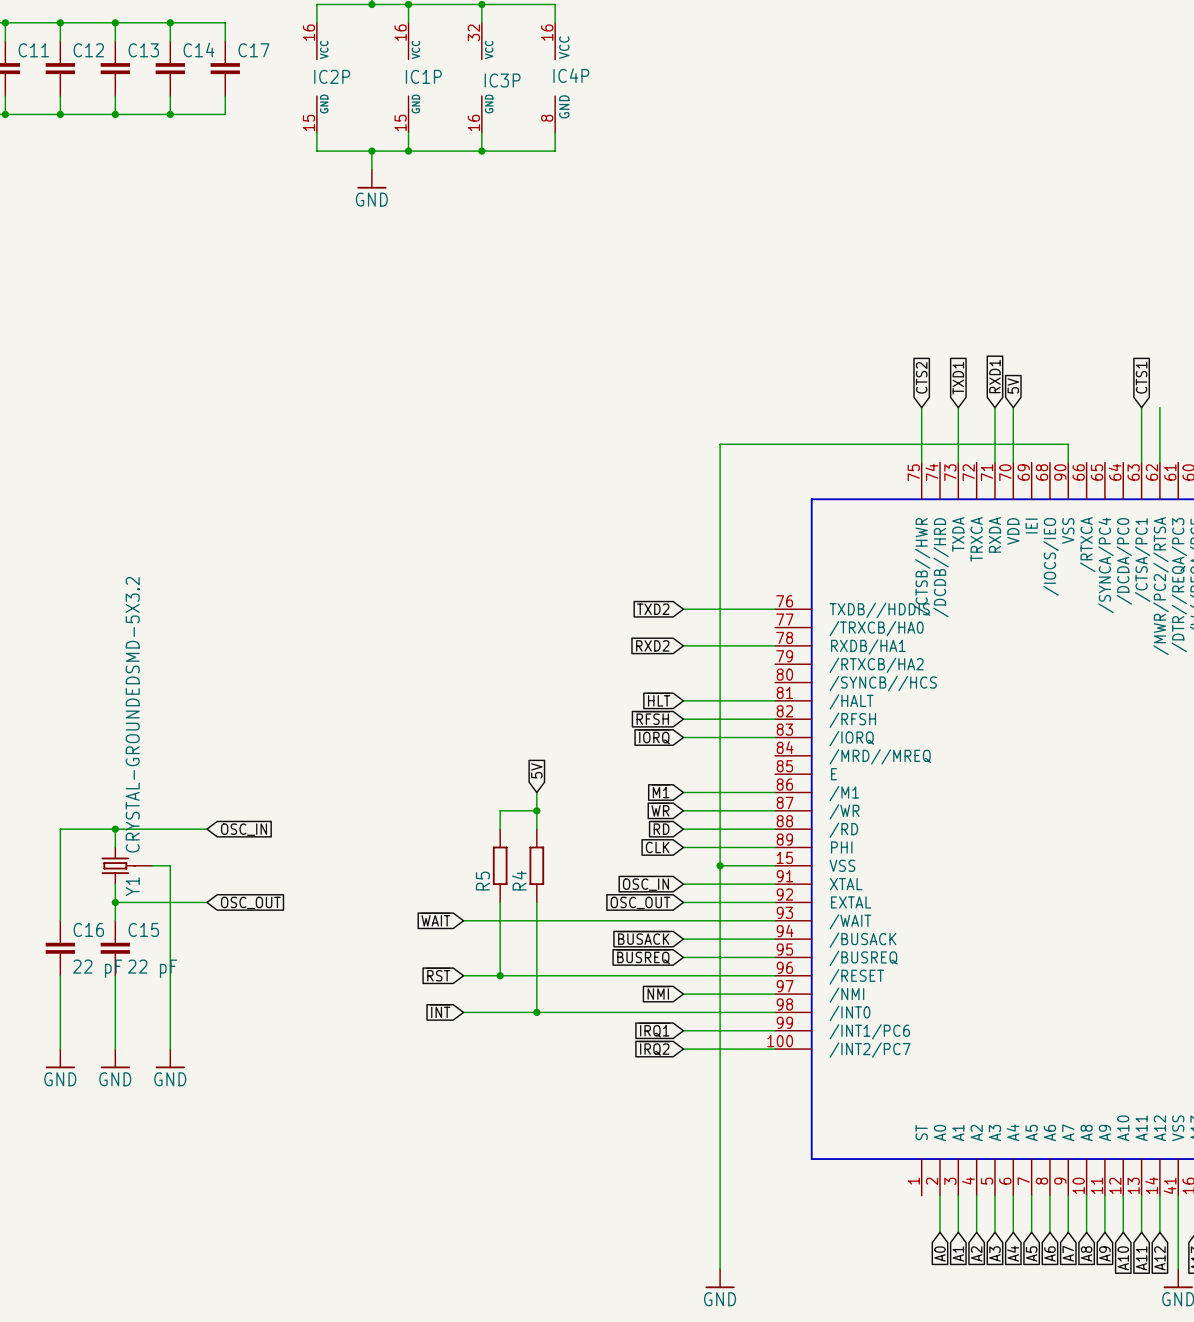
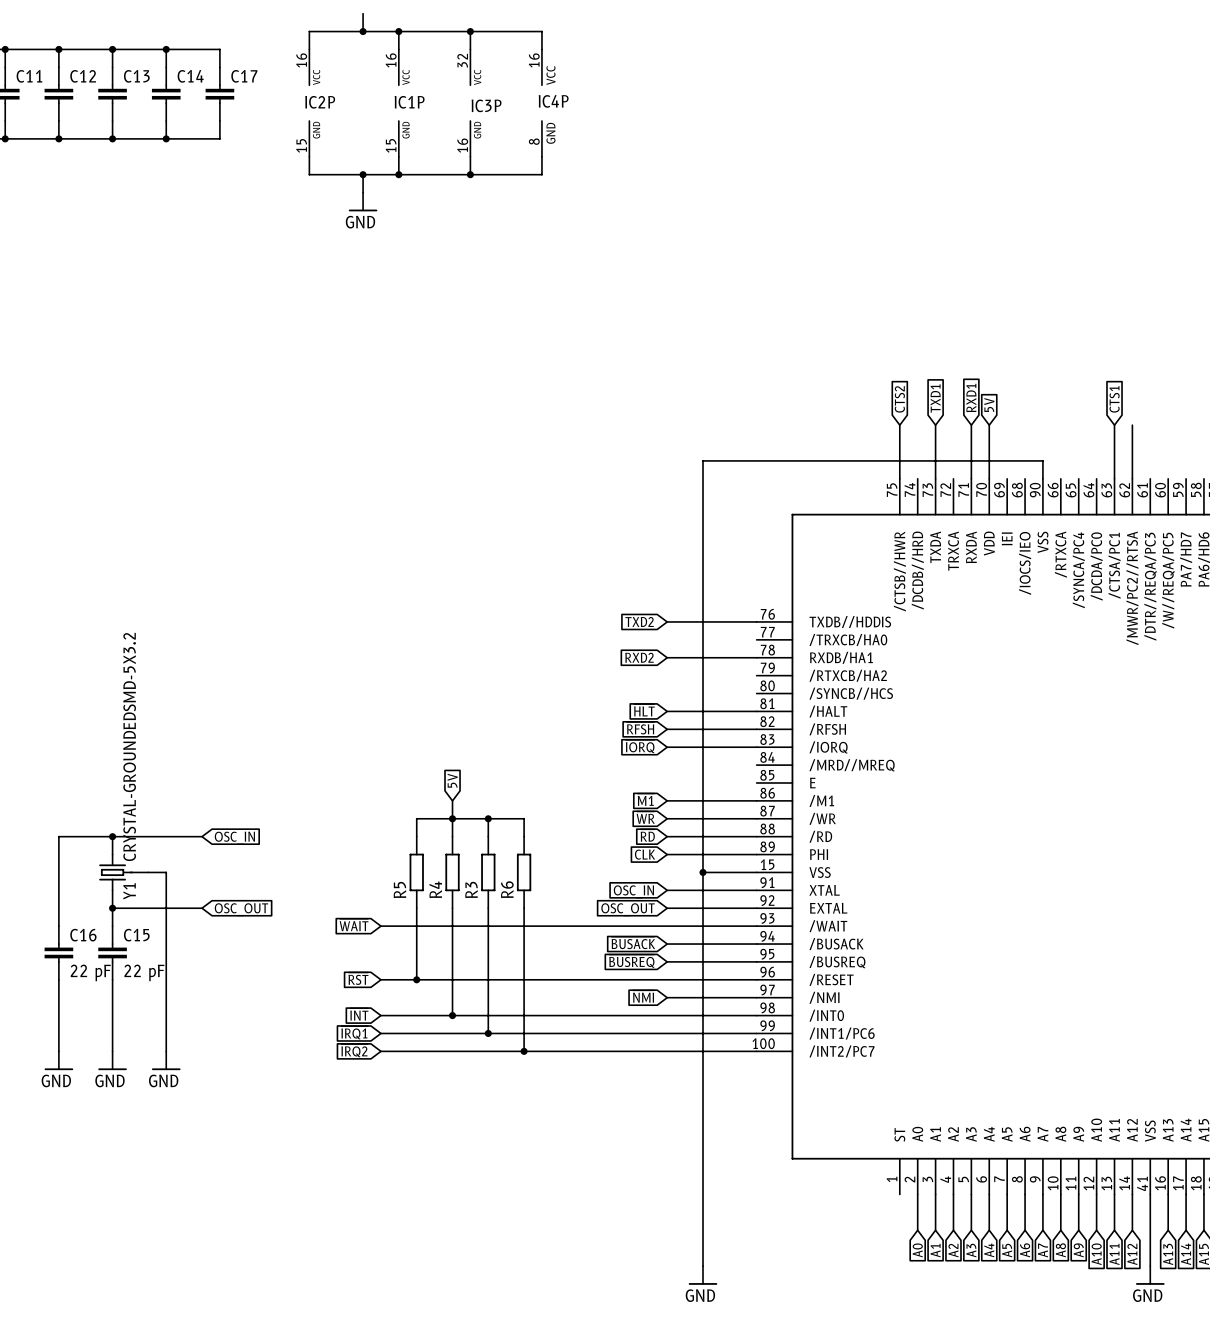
global label position: 5V (536, 770) -> 5V (452, 780)
wire: none -> (452, 800) (452, 836)
wire: (536, 792) (536, 810) -> none
junction: none -> (452, 818)
wire: none -> (488, 818) (416, 818) (416, 836)
junction: none -> (488, 818)
junction: (536, 810) -> none
R5: none -> (416, 872)
R4: none -> (452, 872)
R4 name: R4 (519, 880) -> R6 (507, 889)
R5 name: R5 (482, 881) -> R3 (471, 889)
wire: none -> (416, 908) (416, 979)
wire: none -> (452, 908) (452, 1015) (380, 1015)
global label position: ~{WAIT} (435, 919) -> ~{WAIT} (354, 924)
wire: none -> (380, 926) (452, 926)
global label position: ~{RST} (438, 974) -> ~{RST} (358, 978)
wire: none -> (380, 979) (452, 979)
junction: none -> (416, 979)
wire: none -> (488, 979) (488, 1033)
junction: (500, 975) -> none
global label position: ~{INT} (440, 1011) -> ~{INT} (359, 1014)
junction: none -> (452, 1015)
wire: none -> (524, 1015) (524, 1051)
junction: (536, 1012) -> none
global label: none -> ~{IRQ1} (354, 1032)
wire: none -> (380, 1033) (667, 1033)
junction: none -> (488, 1033)
global label: ~{IRQ1} (654, 1030) -> none
global label: none -> ~{IRQ2} (354, 1050)
global label: ~{IRQ2} (654, 1048) -> none
wire: none -> (380, 1051) (667, 1051)
junction: none -> (524, 1051)

